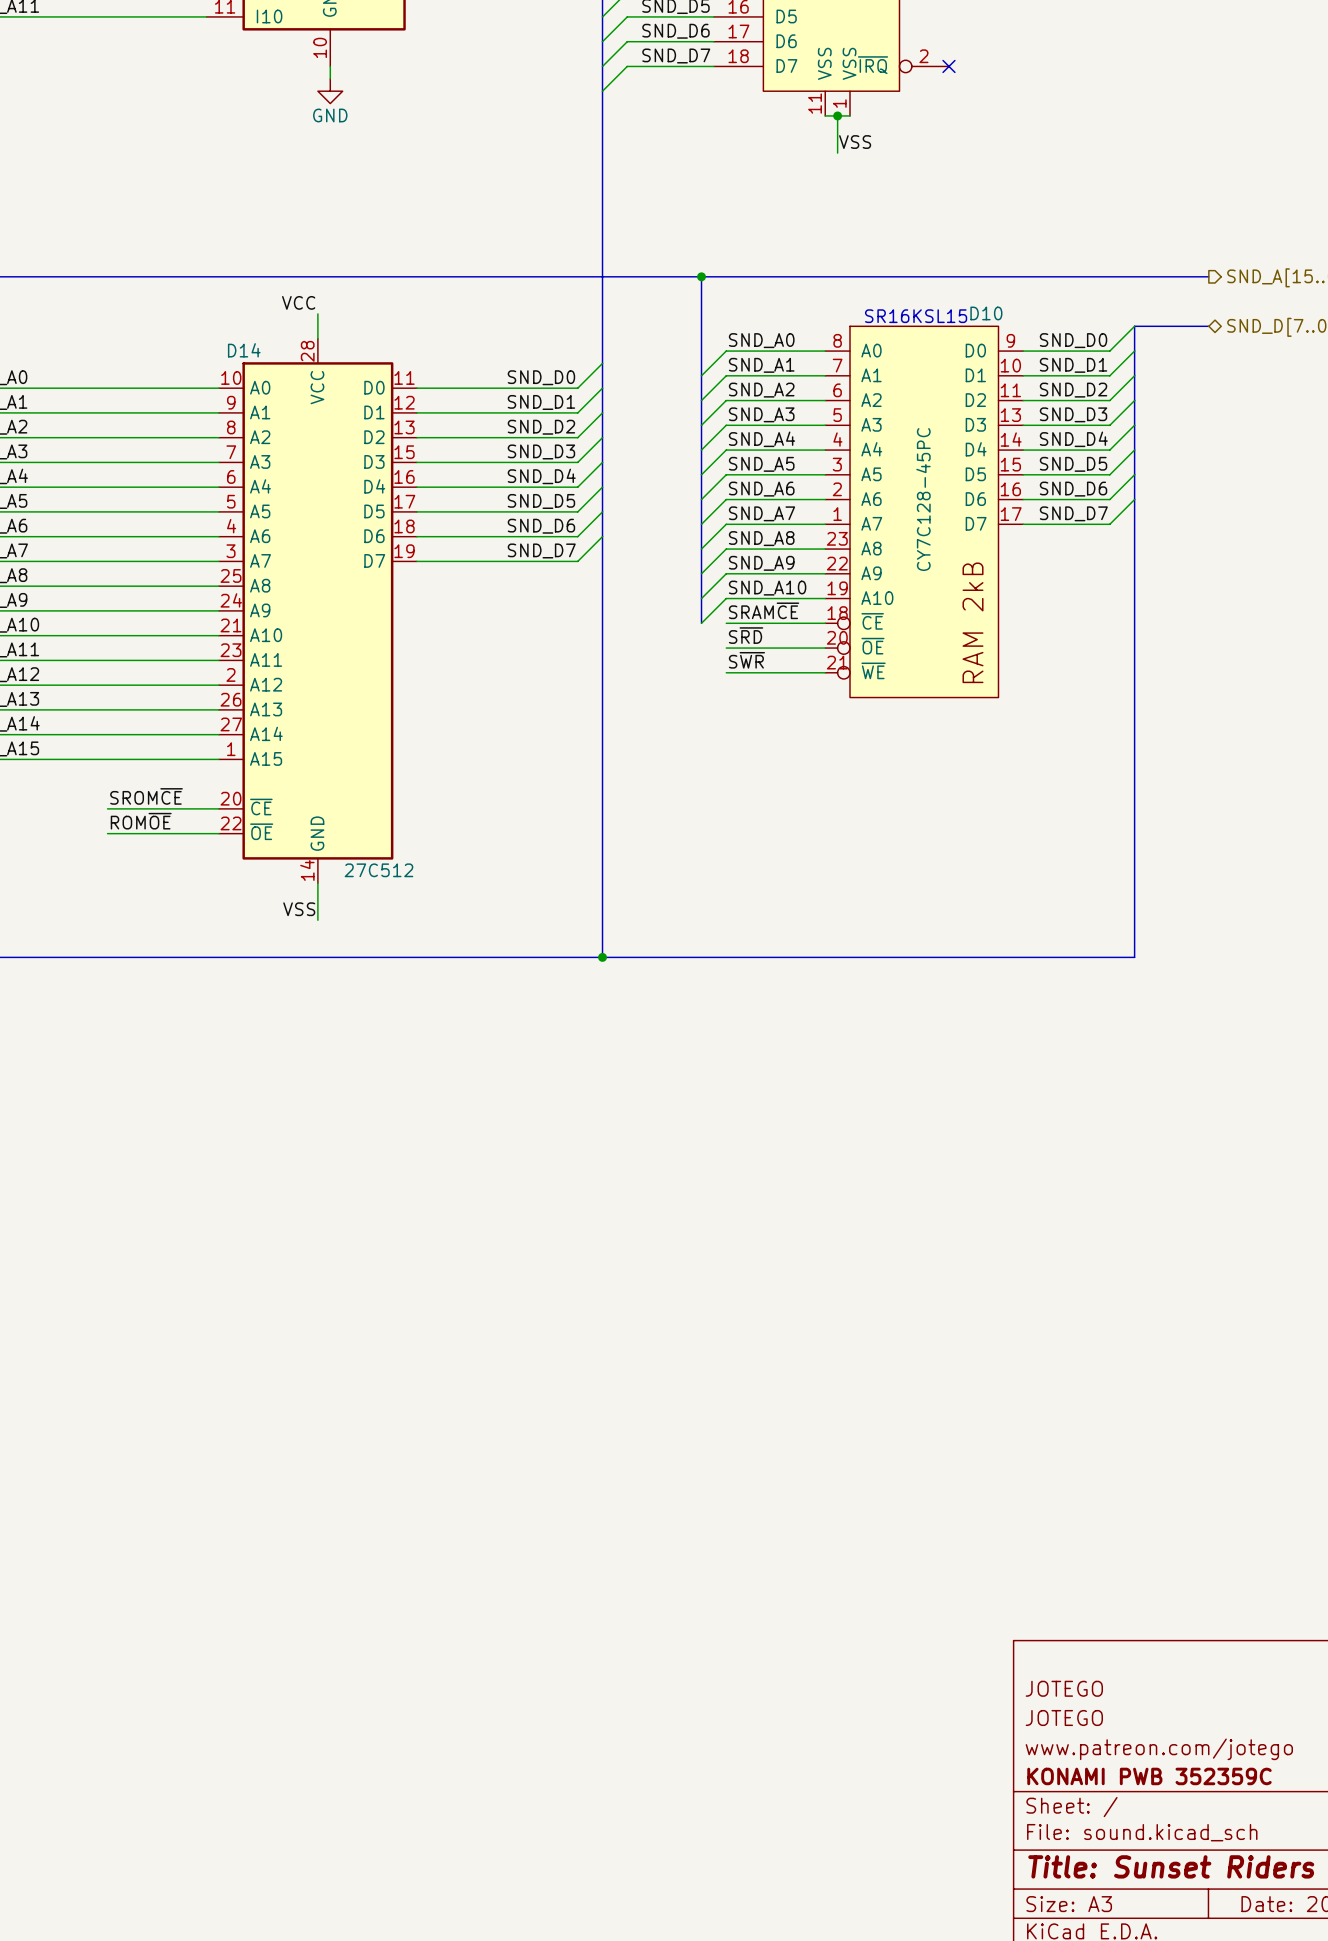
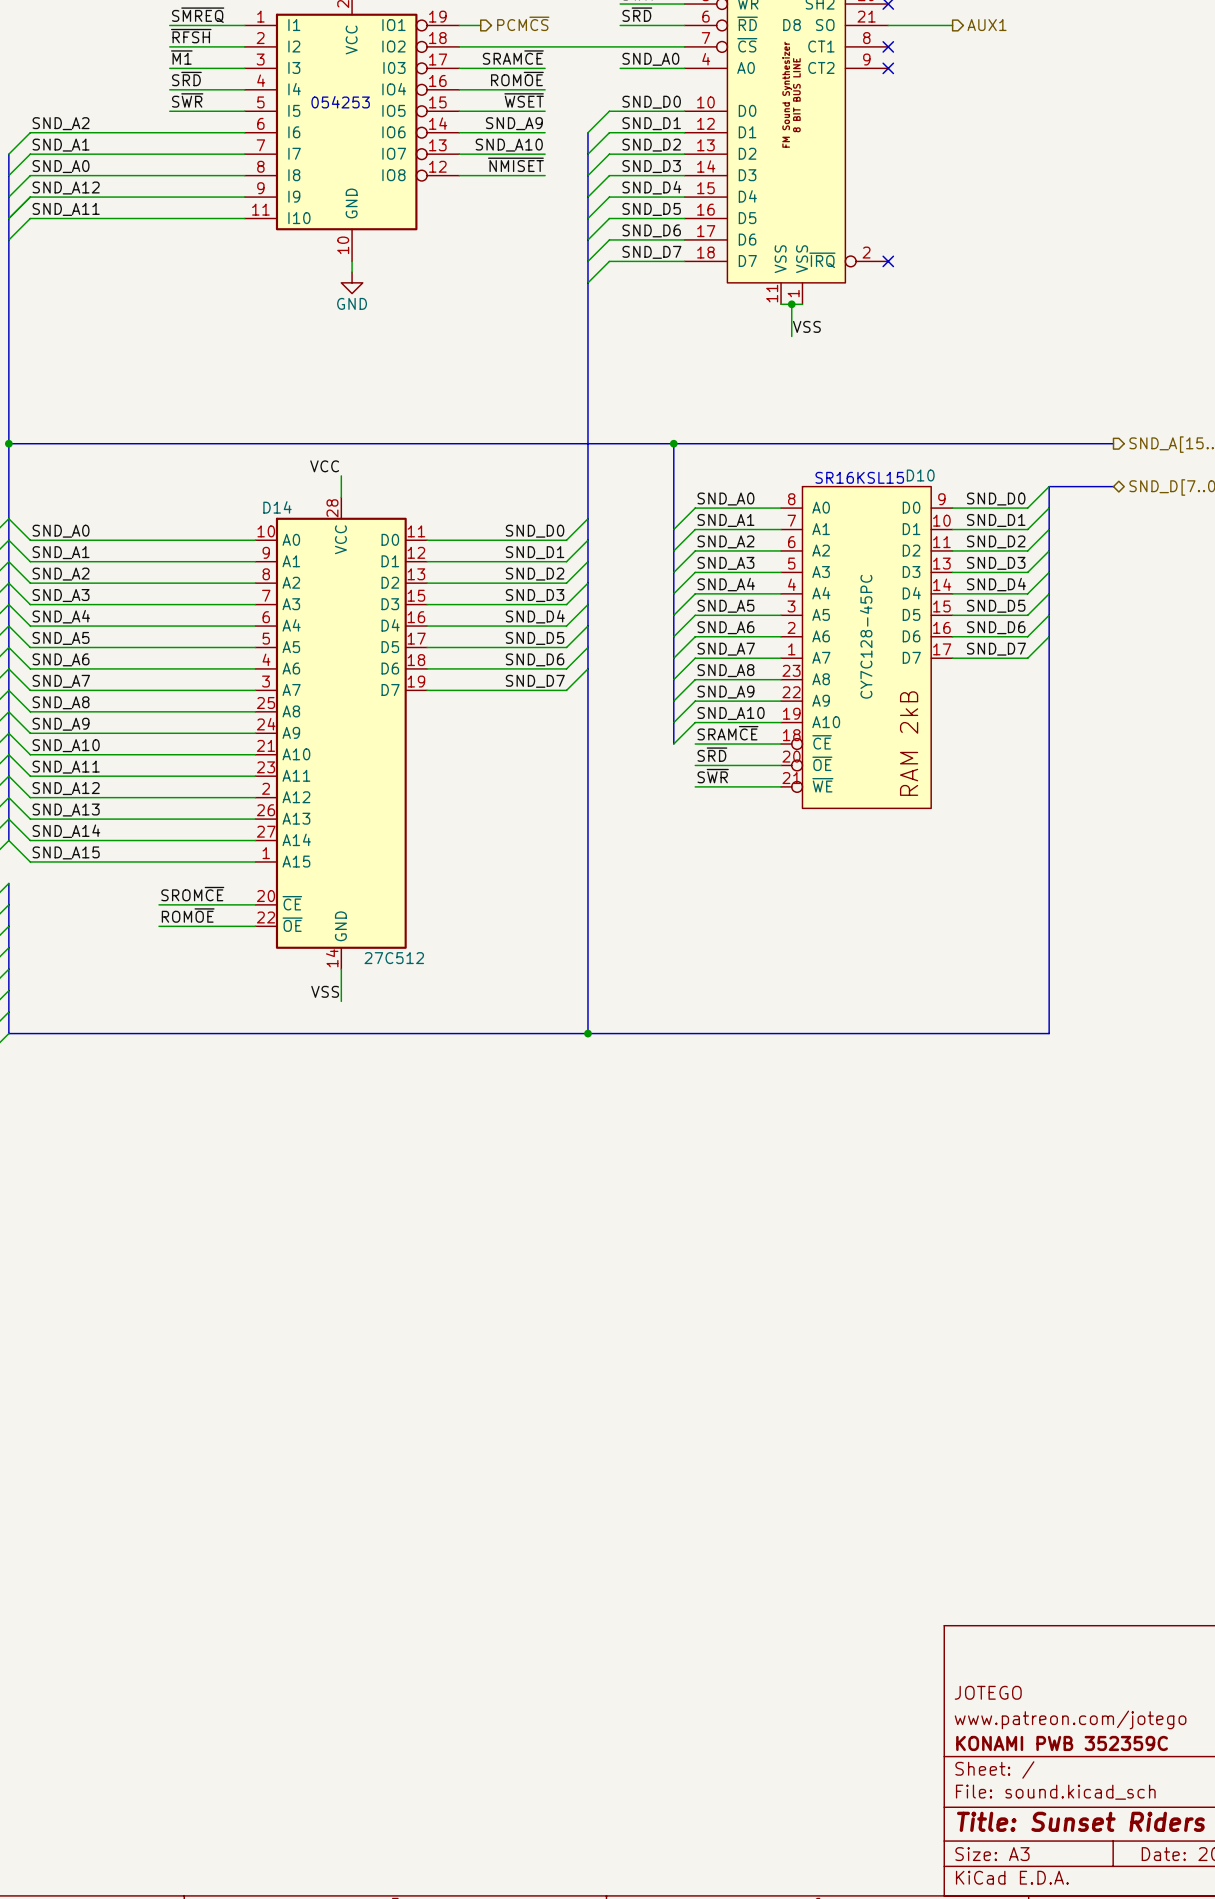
title block: JOTEGO (1064, 1688) -> none

